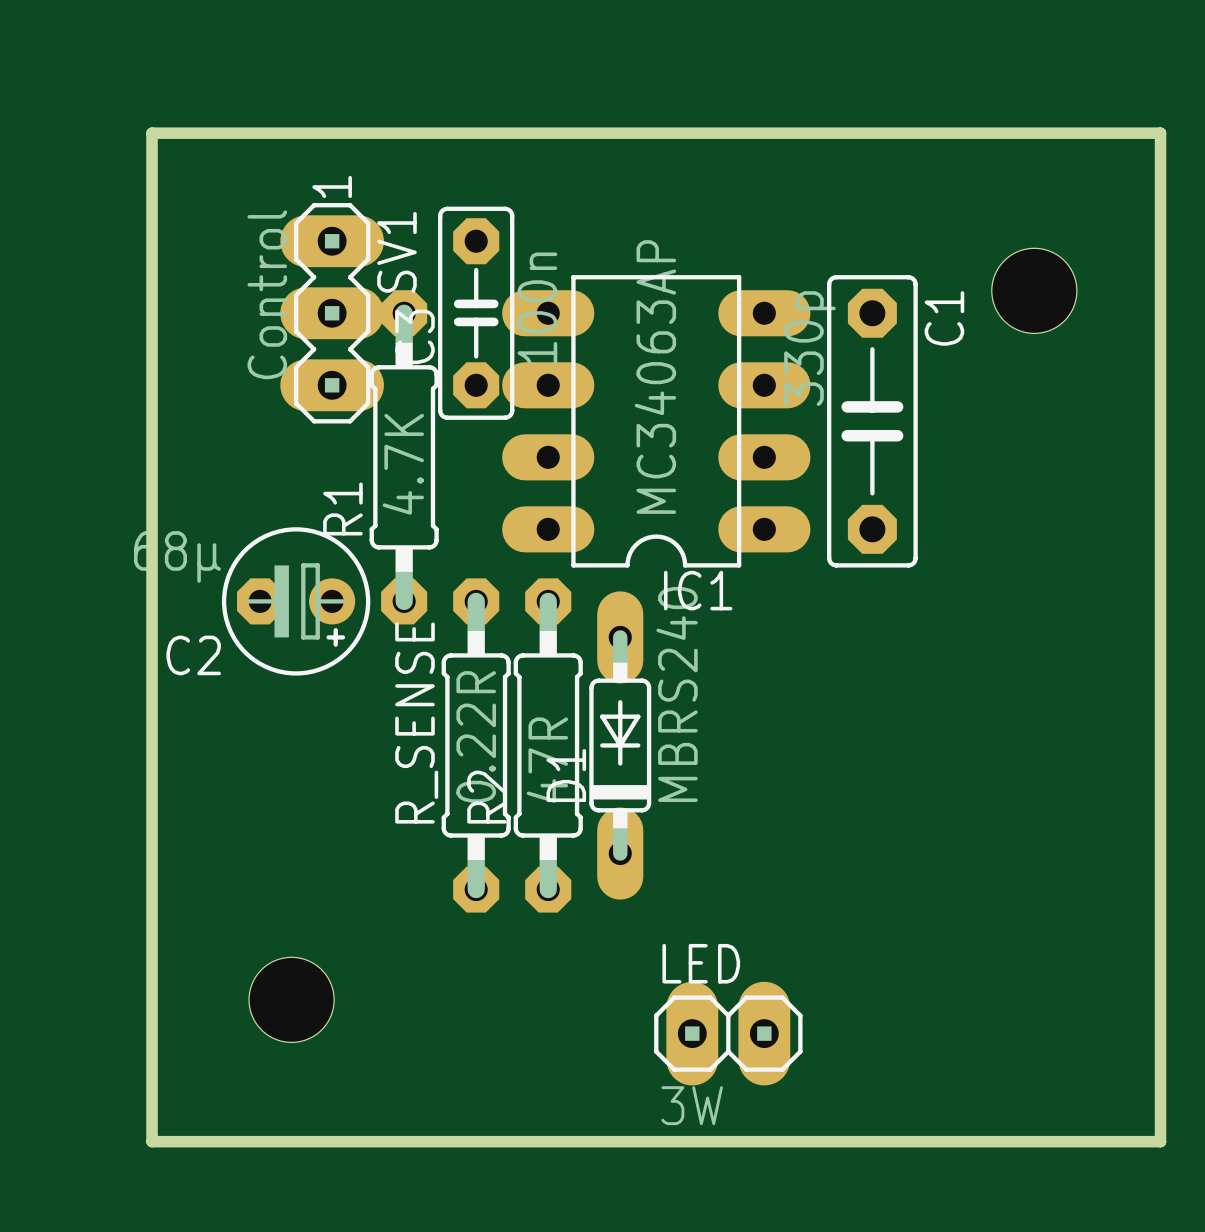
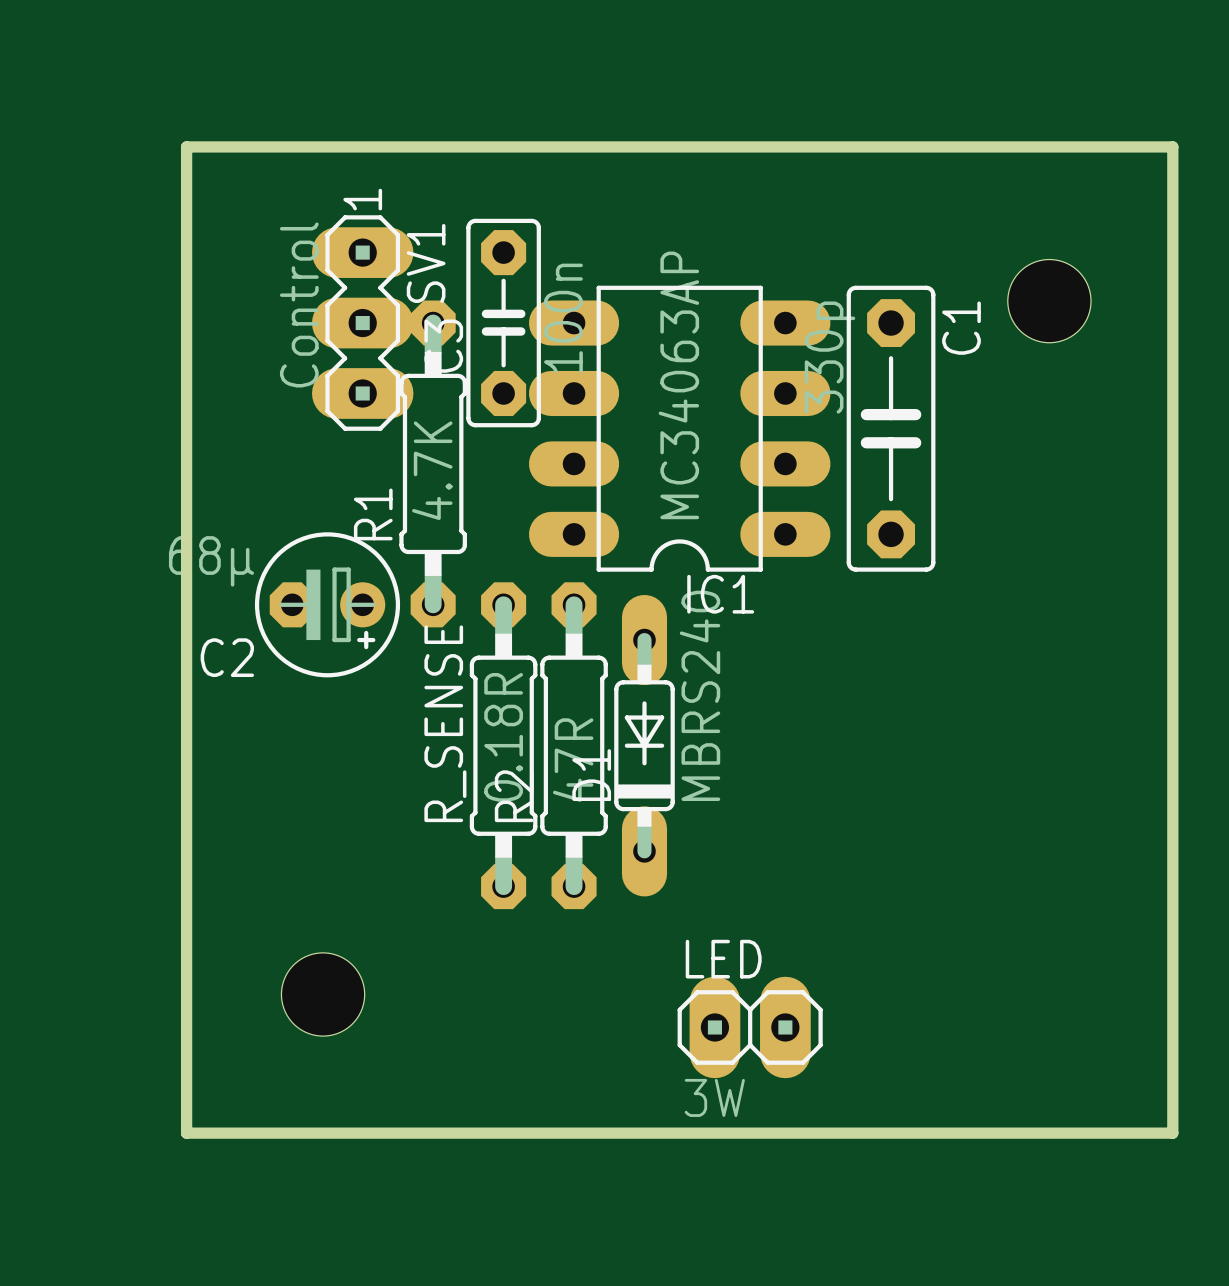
R_SENSE value: 0.22R (476, 736) -> 0.18R (503, 737)

